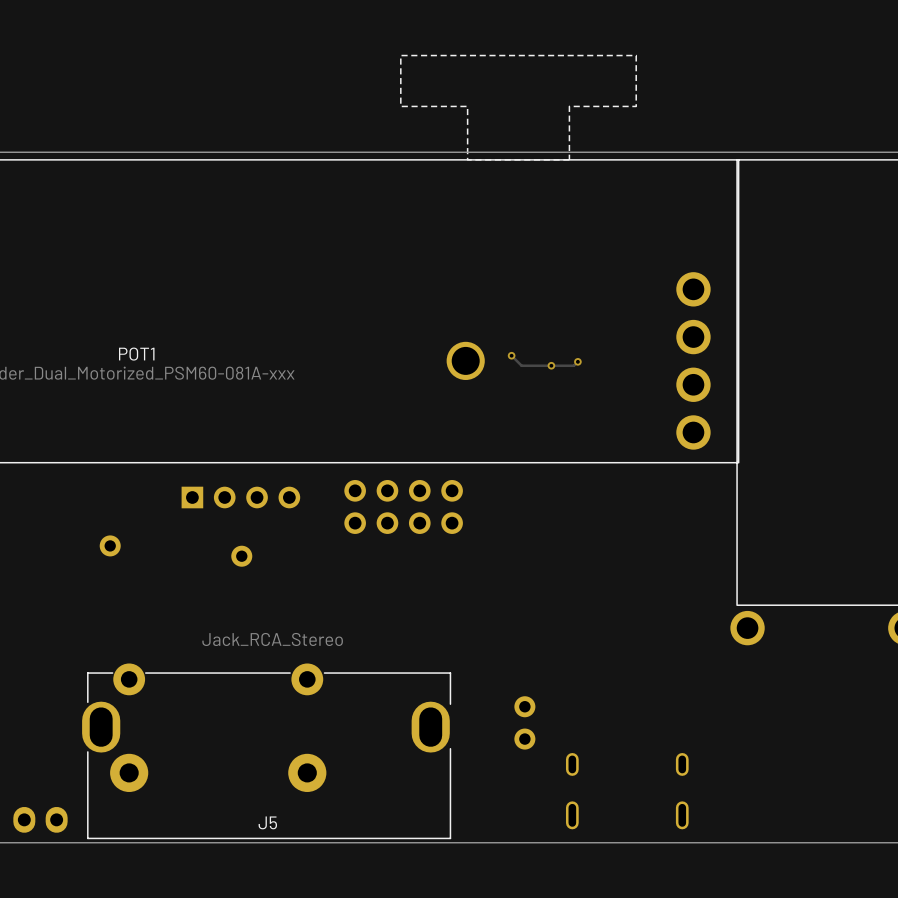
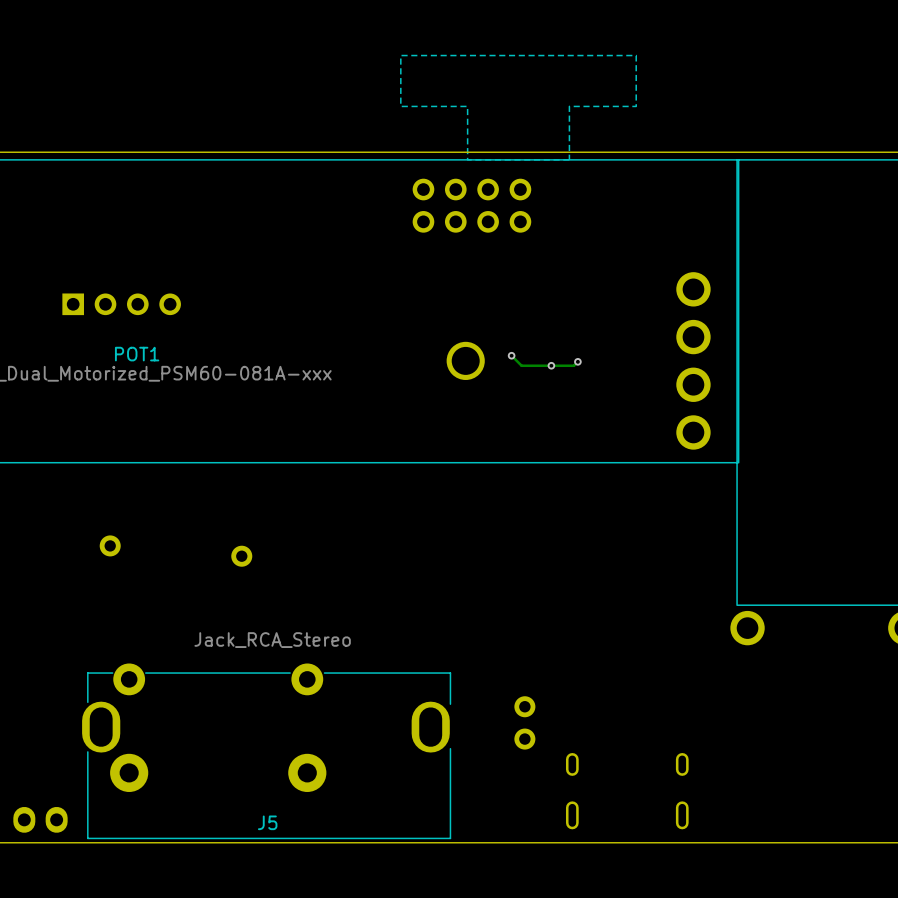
part position: (240, 497) -> (121, 304)
part position: (403, 506) -> (471, 205)

